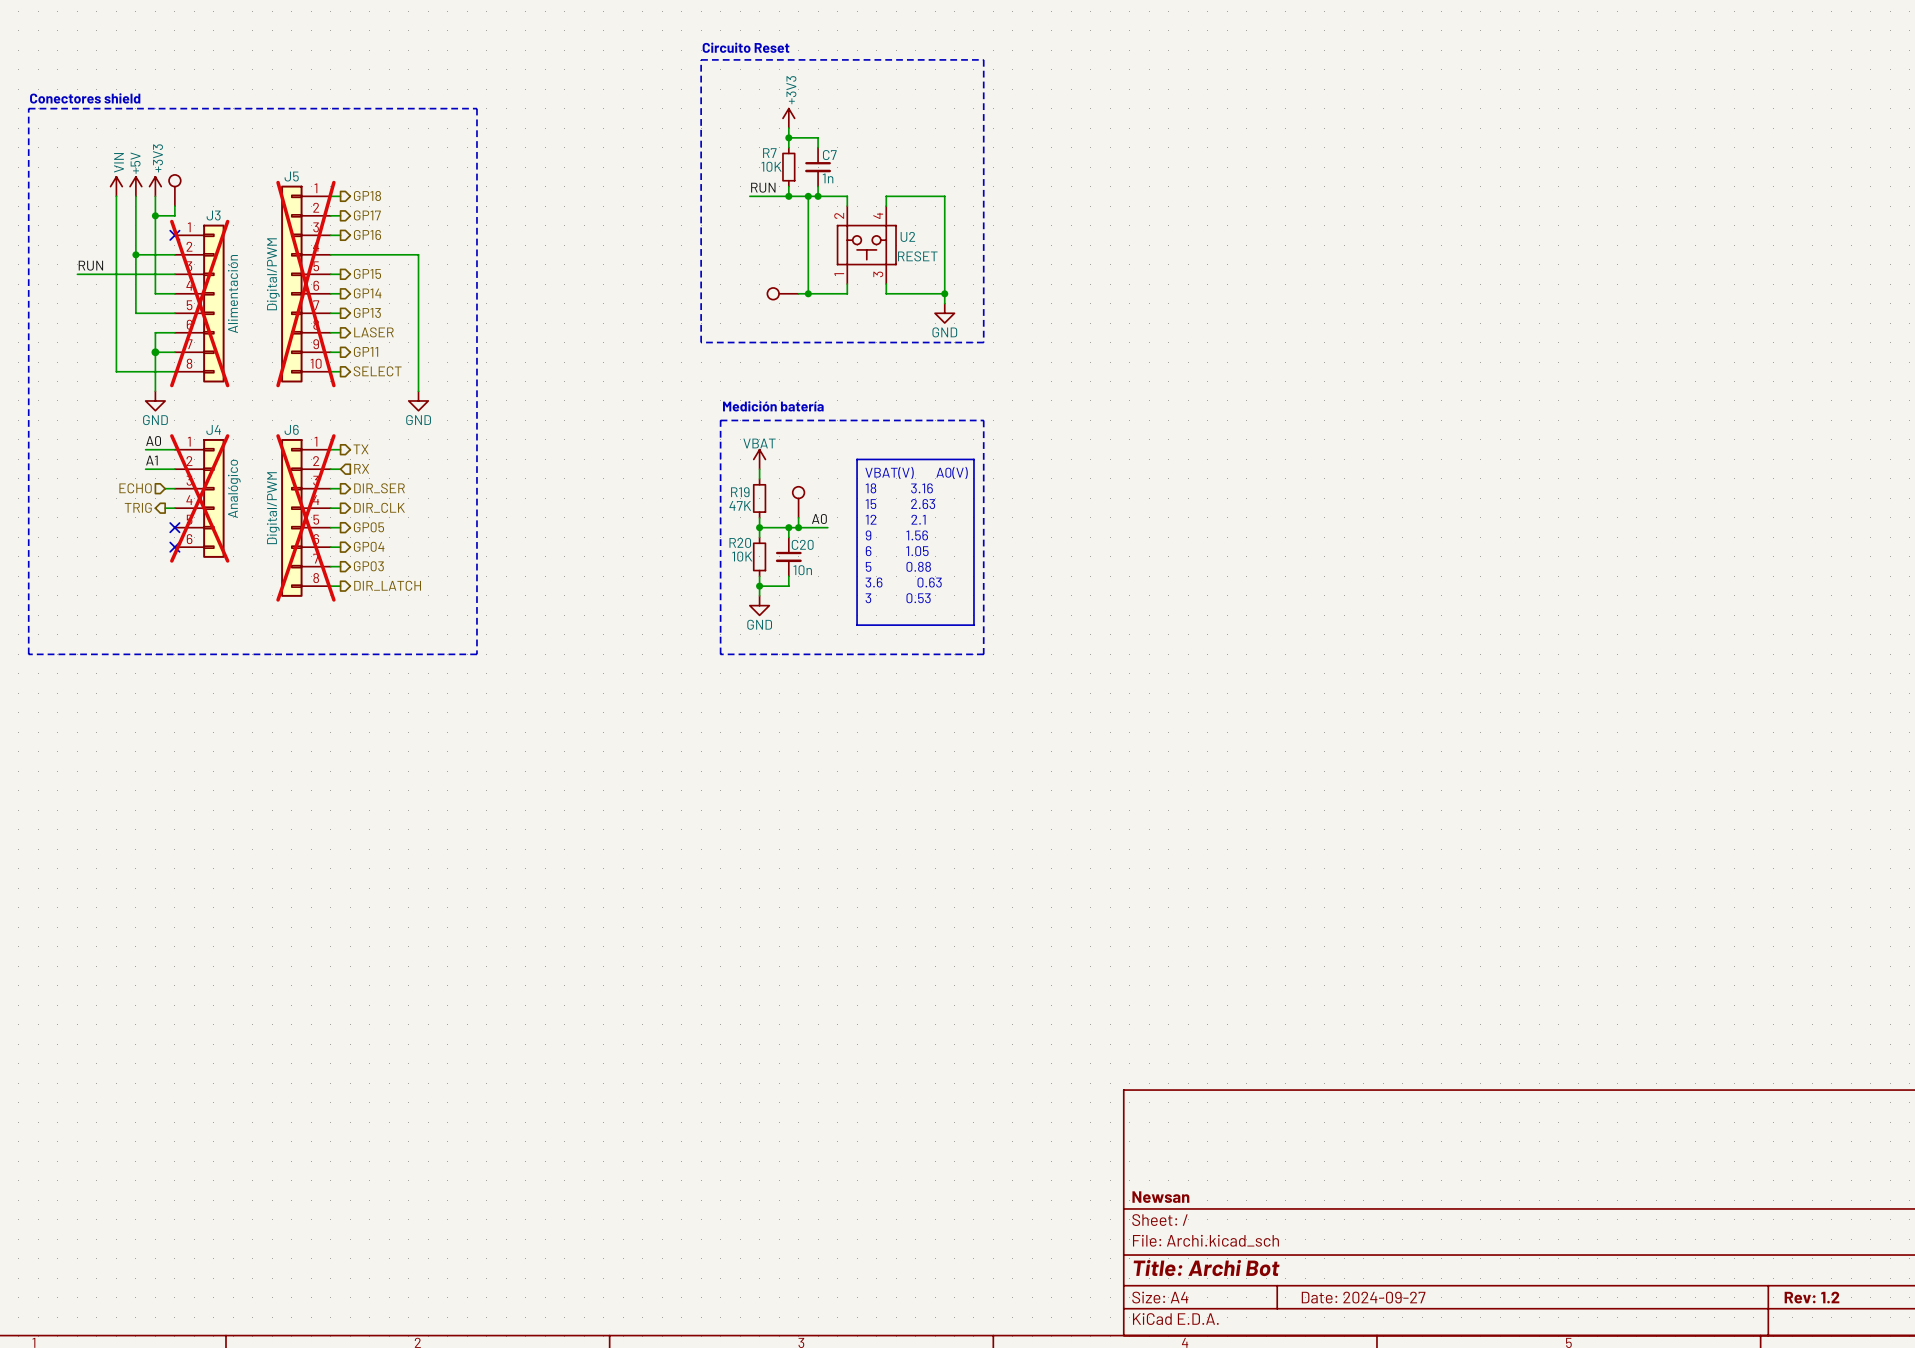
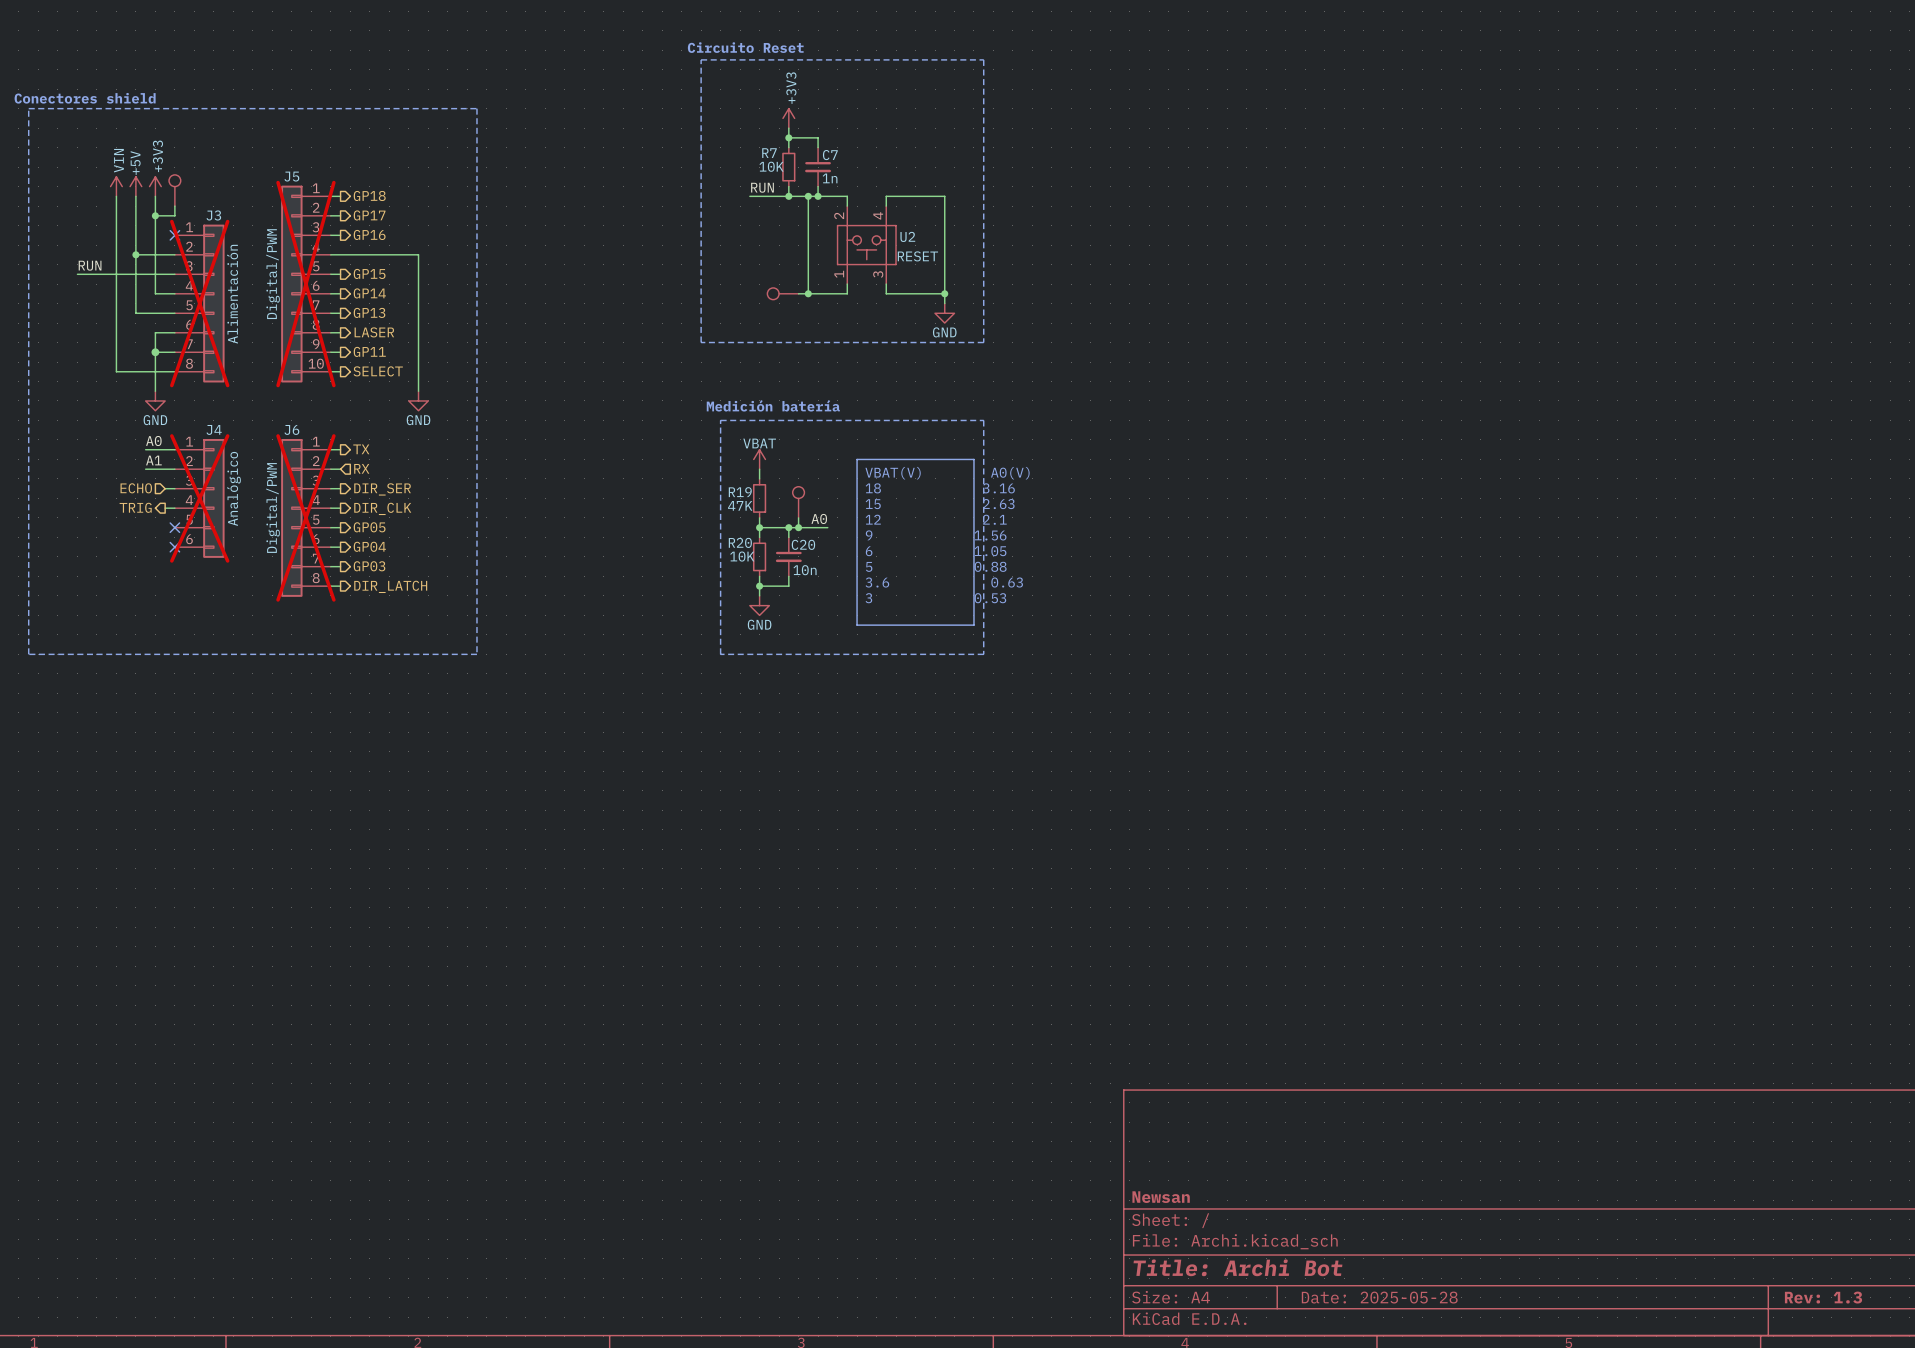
title block: Date: 2024-09-27 (1363, 1297) -> Date: 2025-05-28 (1379, 1297)
title block: Rev: 1.2 (1812, 1297) -> Rev: 1.3 (1823, 1297)

